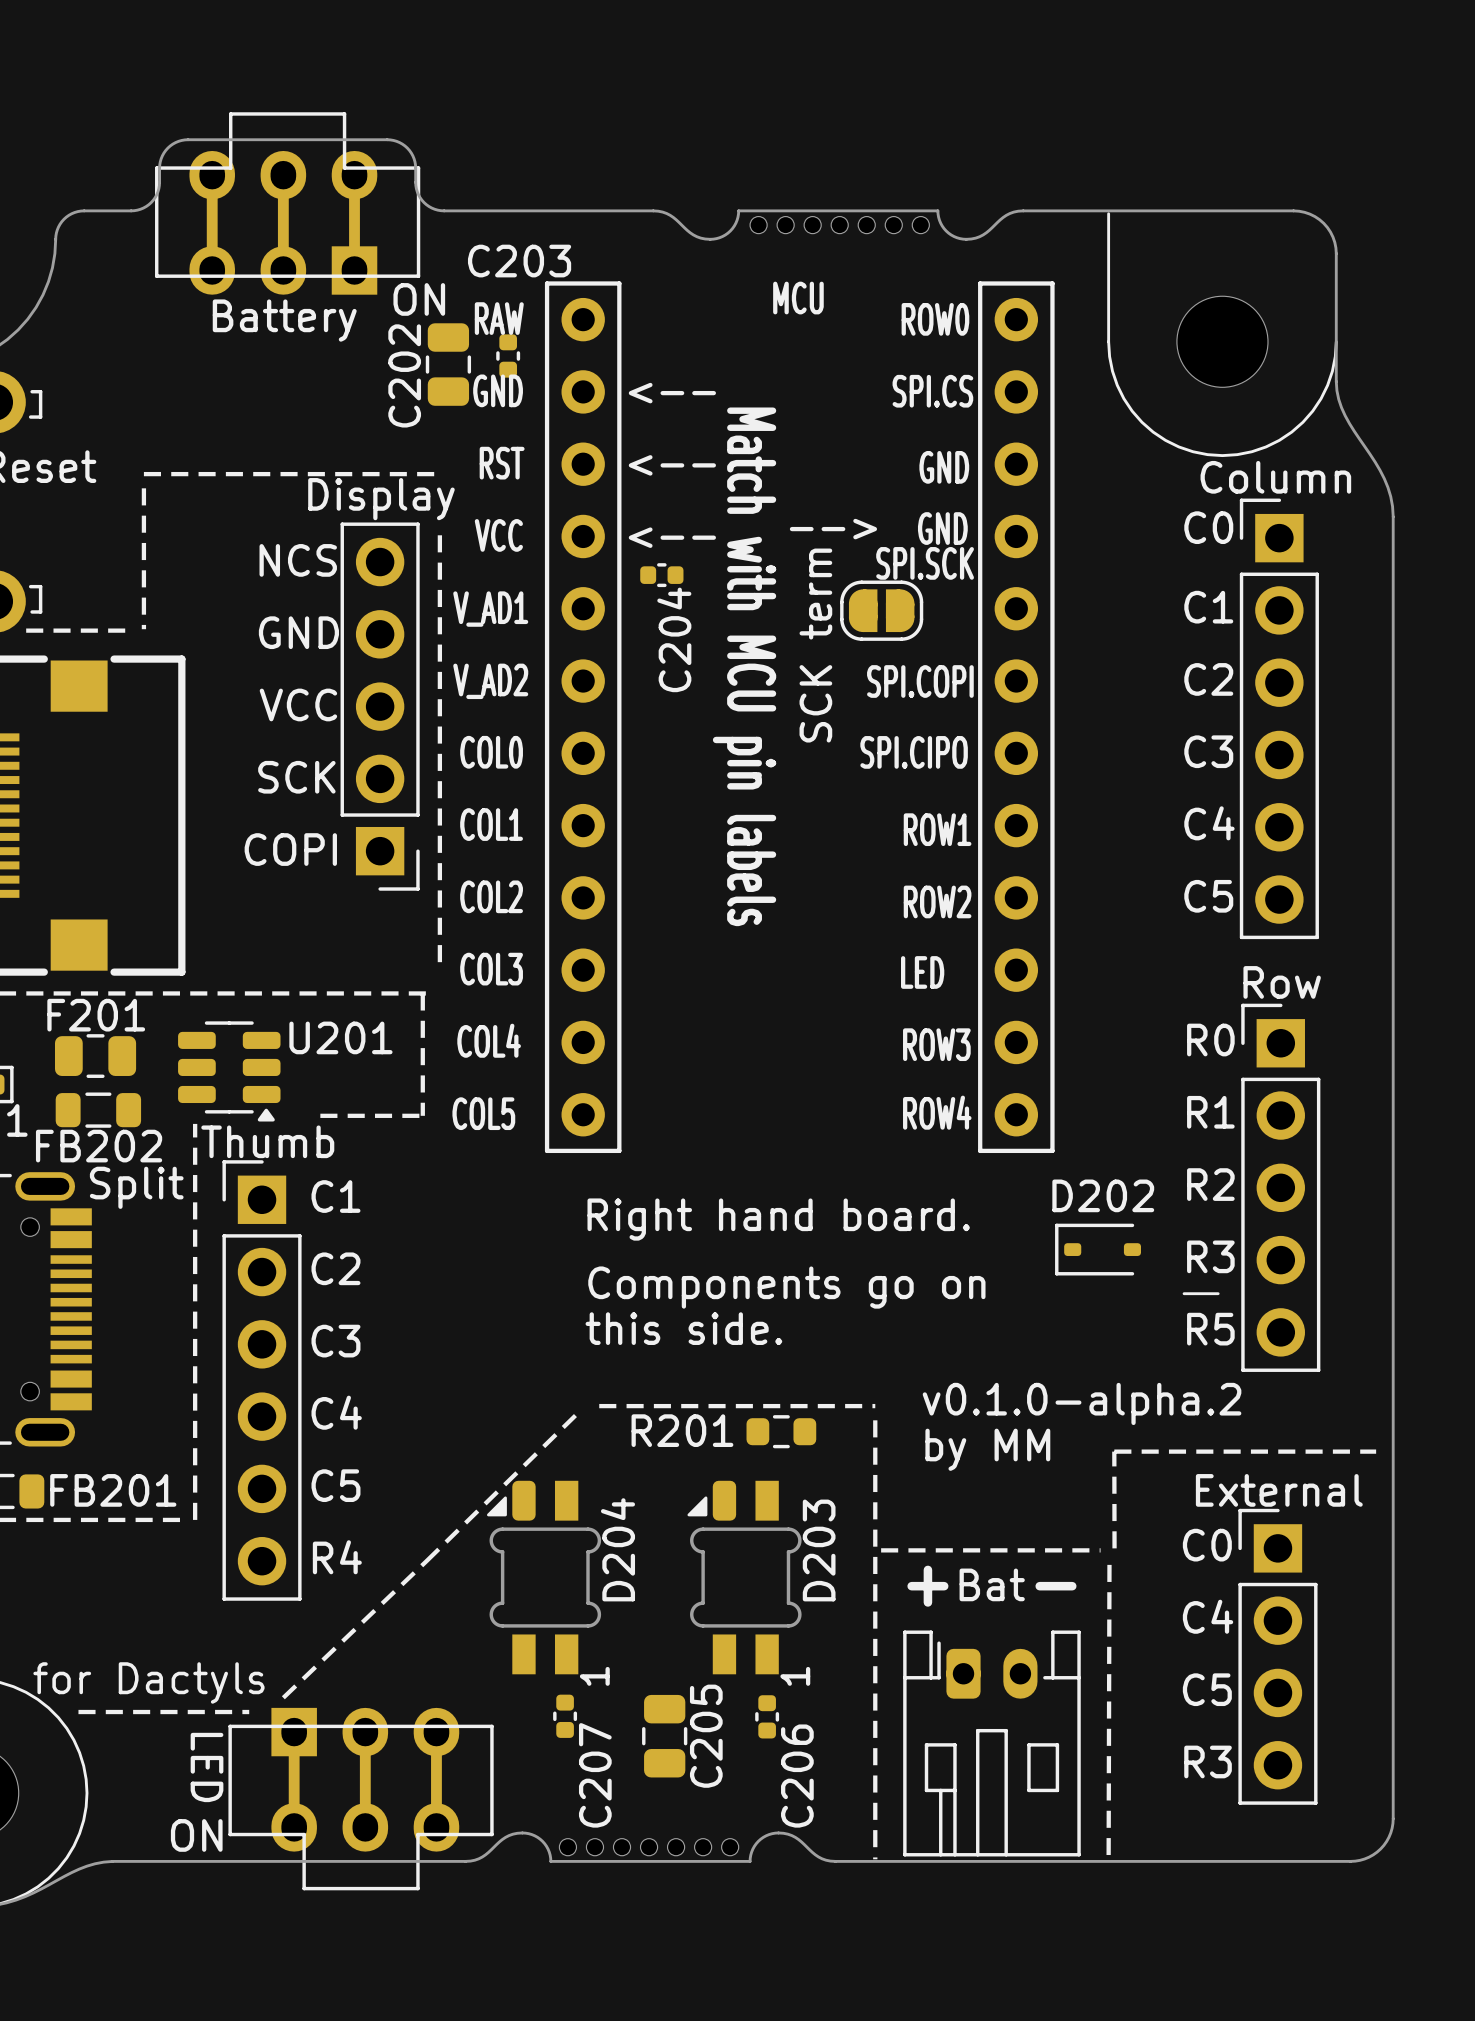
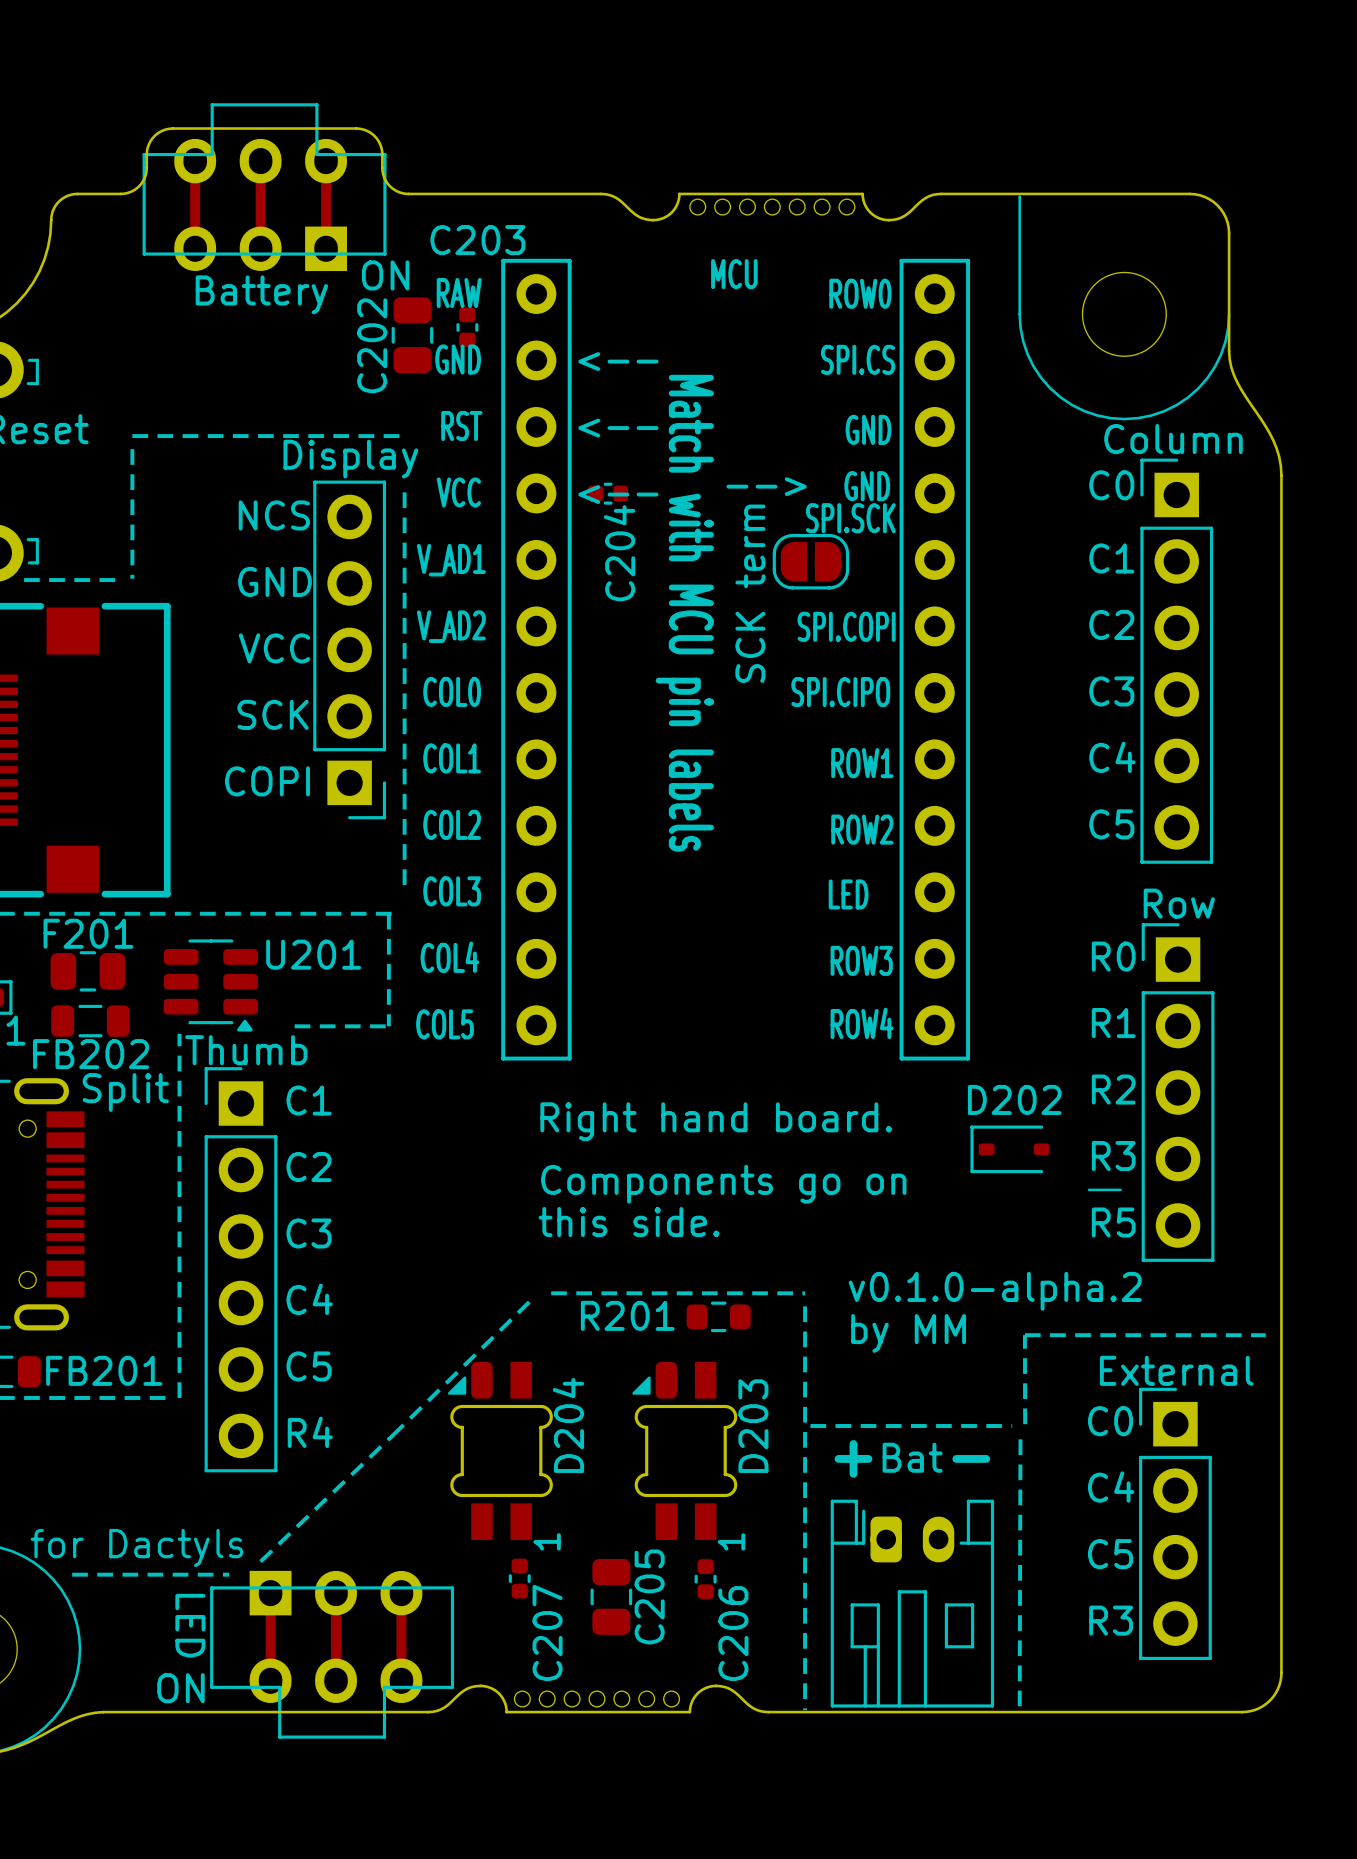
C204 position: (661, 575) -> (608, 493)

